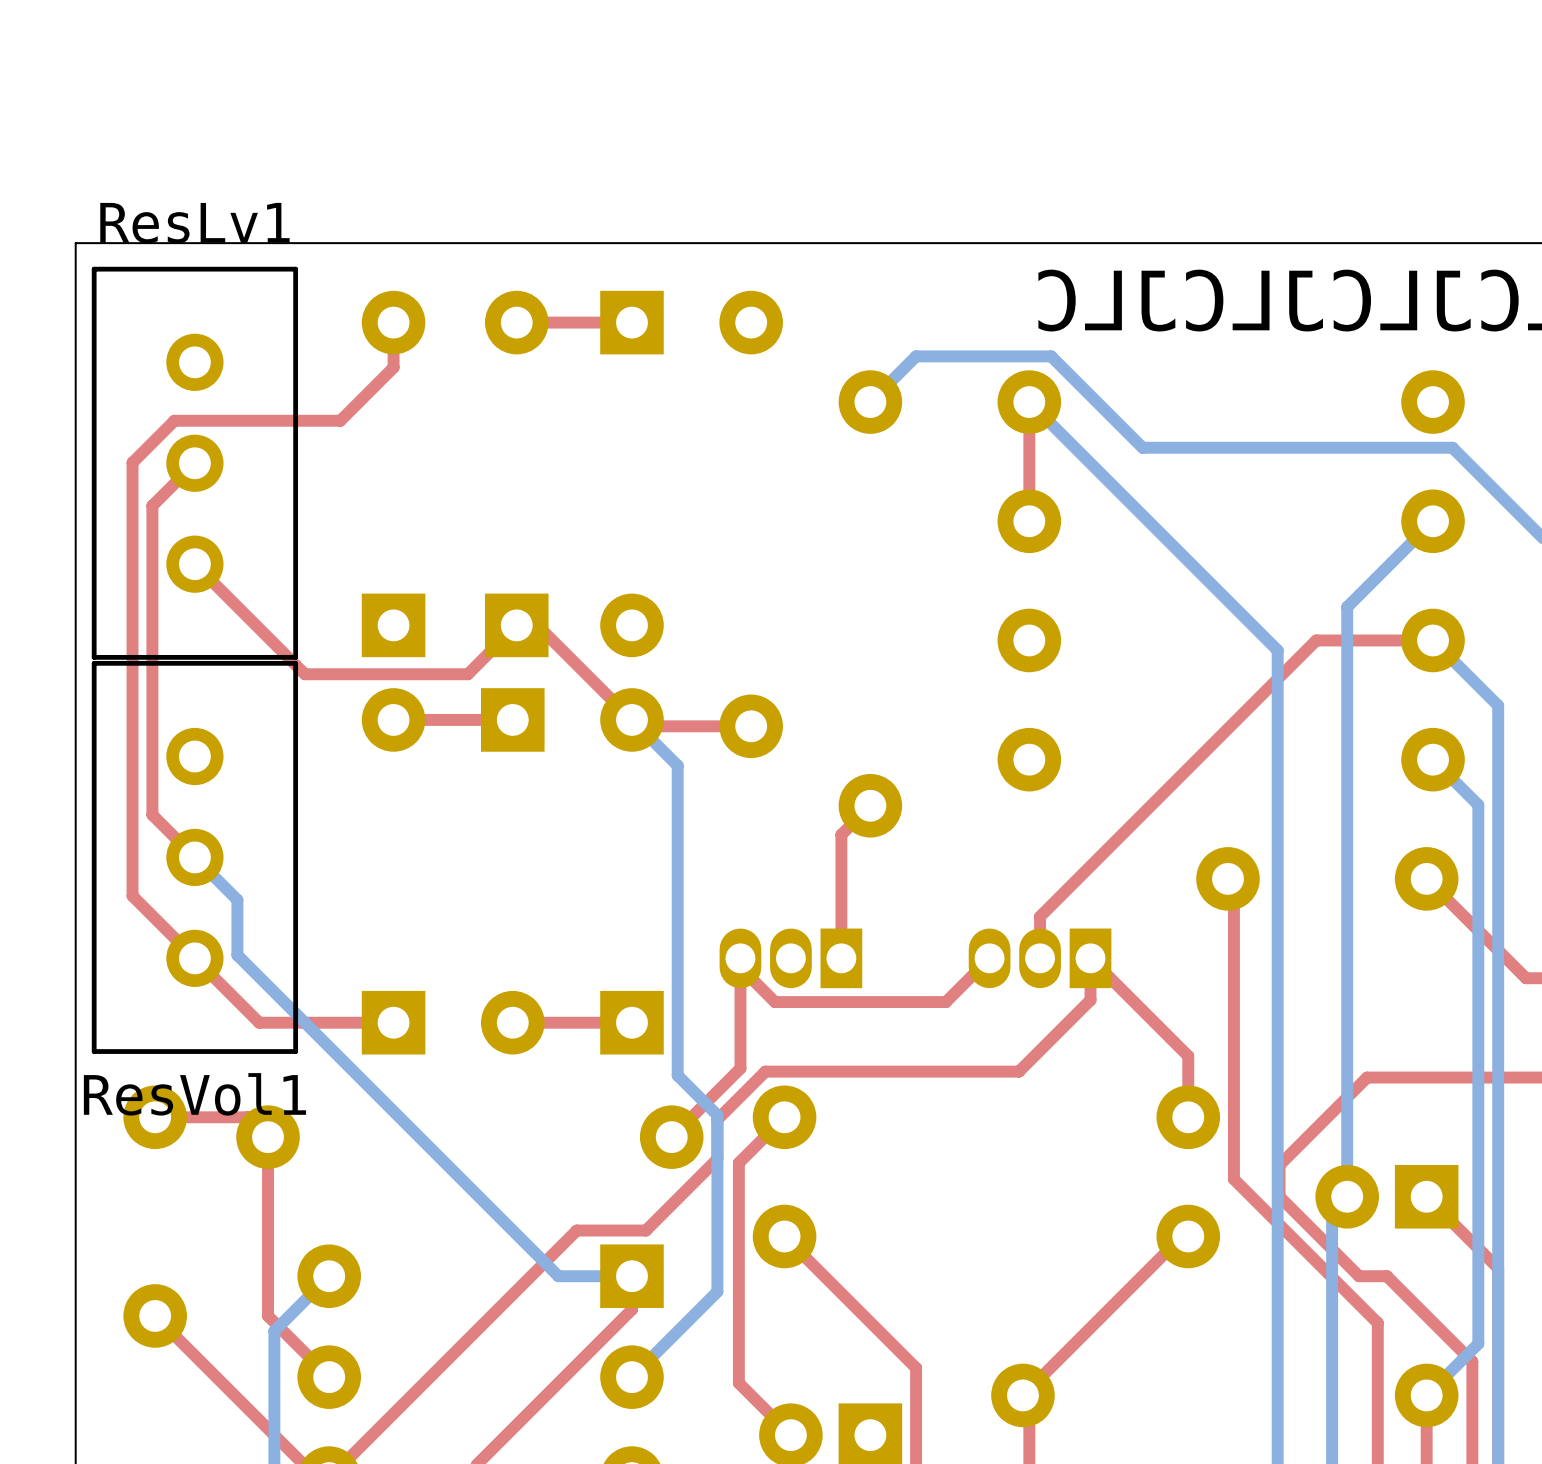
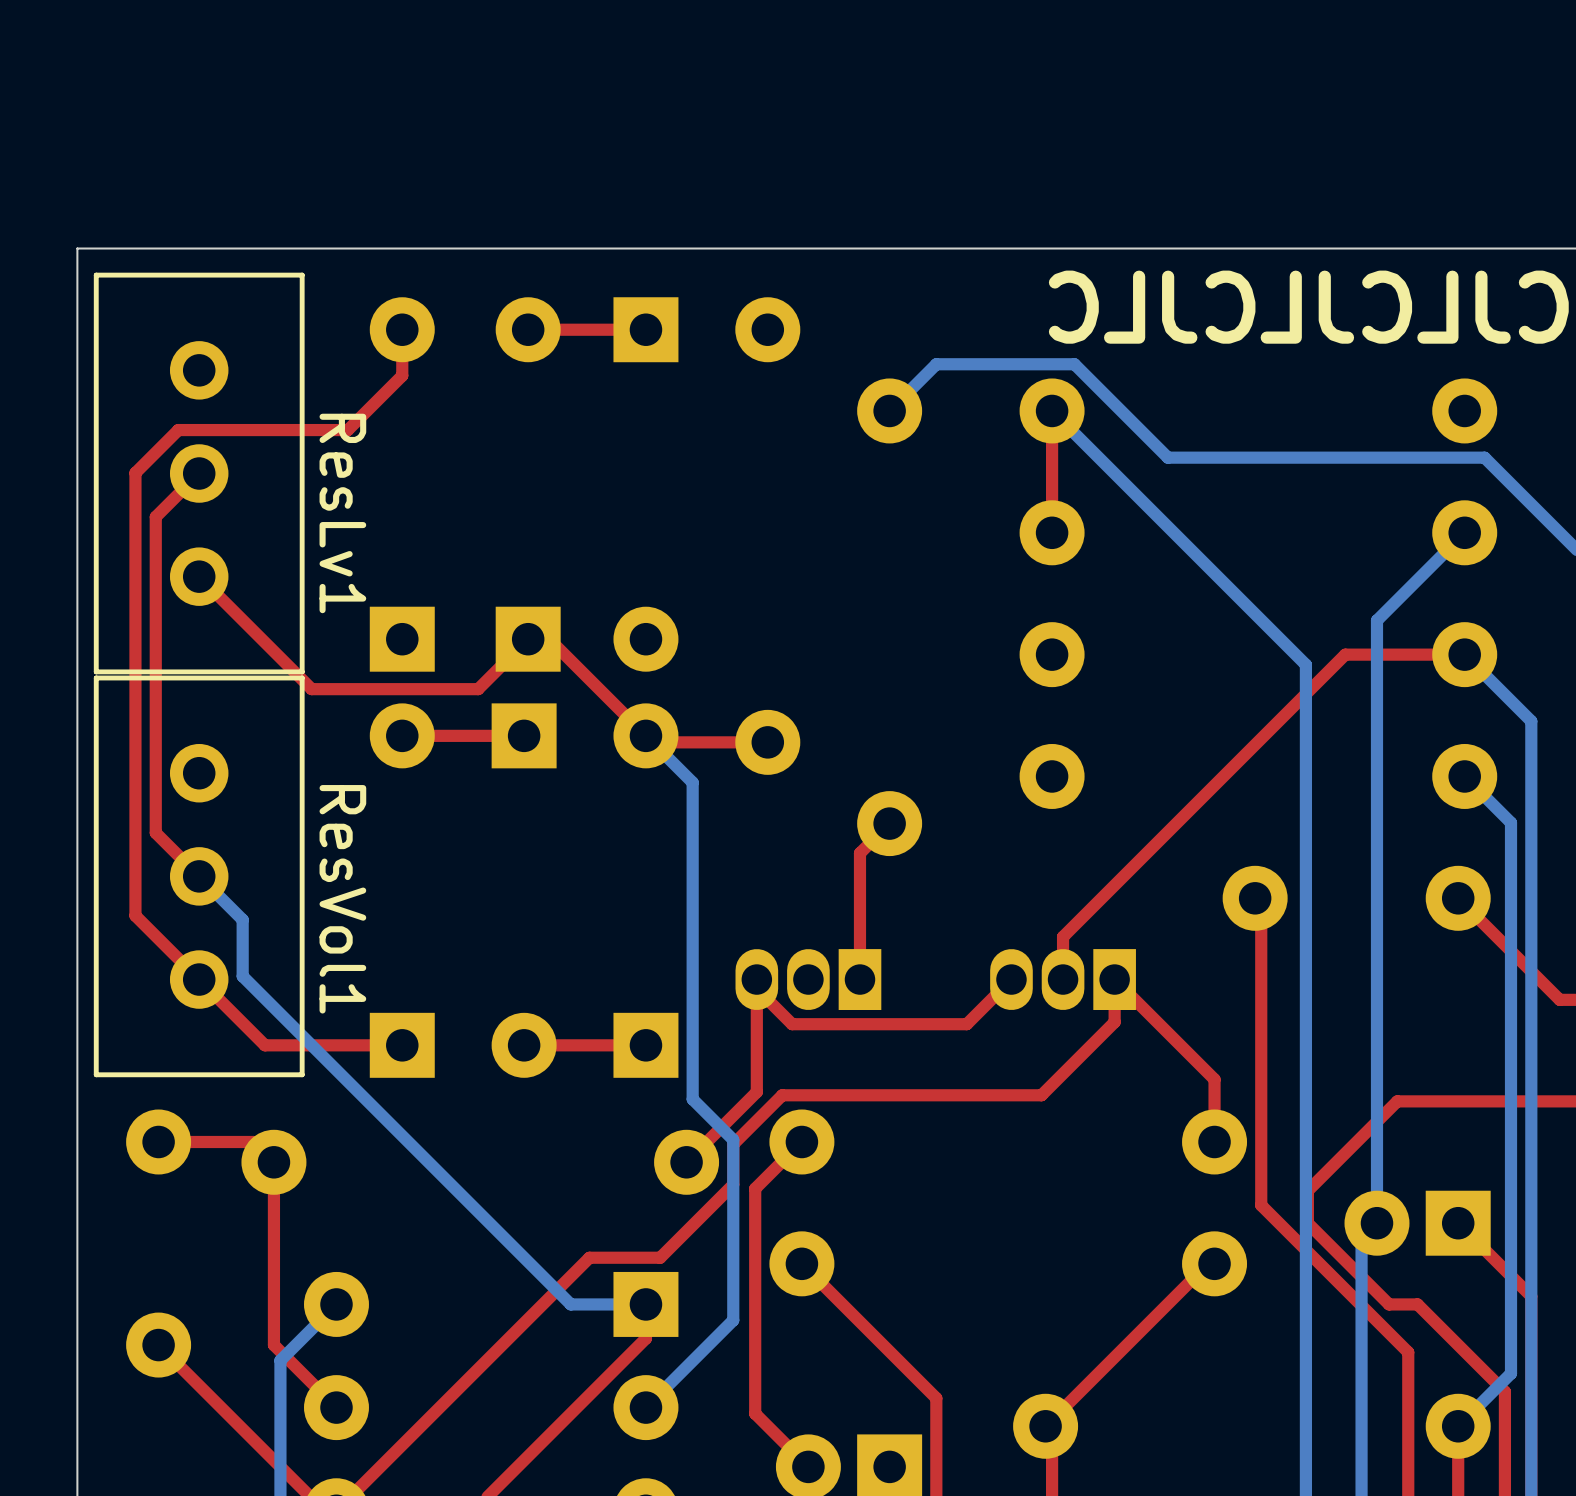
ResLv1 name rotation: 0° (194, 223) -> 90° clockwise (342, 513)
ResLv1 name position: ResLv1 (194, 223) -> ResLv1 (342, 513)
ResVol1 name rotation: 0° (194, 1094) -> 90° clockwise (342, 899)

